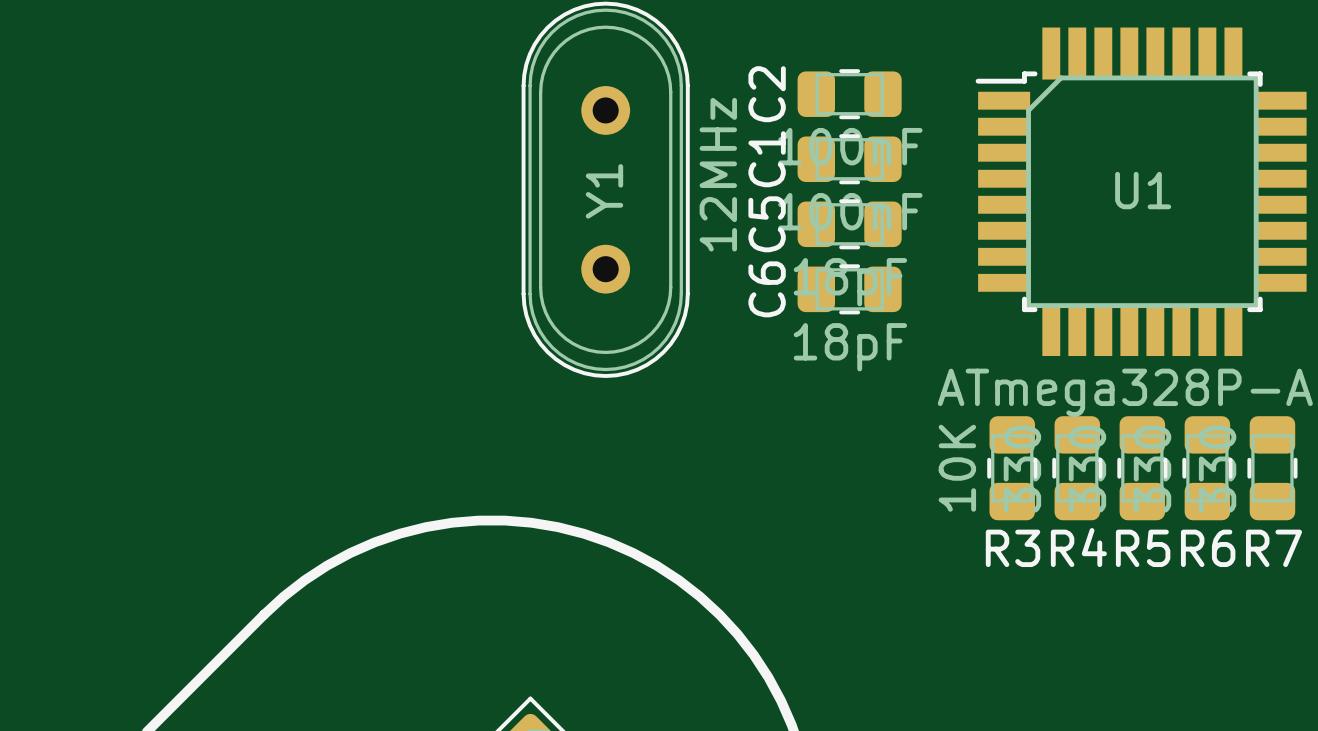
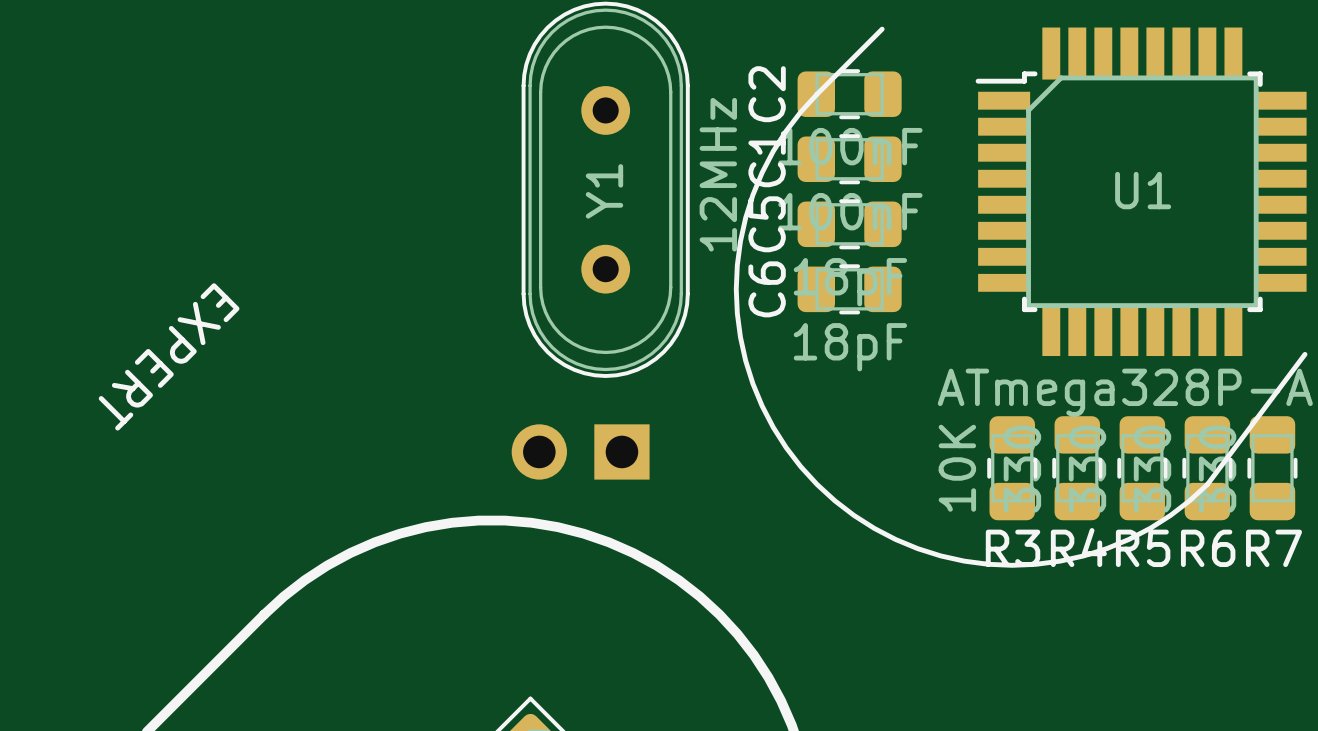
line: none -> (882, 29) (800, 111) (773, 151) (752, 194) (740, 241) (737, 265) (737, 313) (740, 337) (745, 360) (762, 405) (786, 447) (800, 466) (834, 500) (874, 528) (895, 539) (940, 555) (988, 564) (1012, 565) (1036, 564) (1083, 555) (1128, 539) (1170, 515) (1189, 500) (1207, 484) (1304, 354)
text: none -> EXPERT (169, 356)
part: none -> (580, 451)

